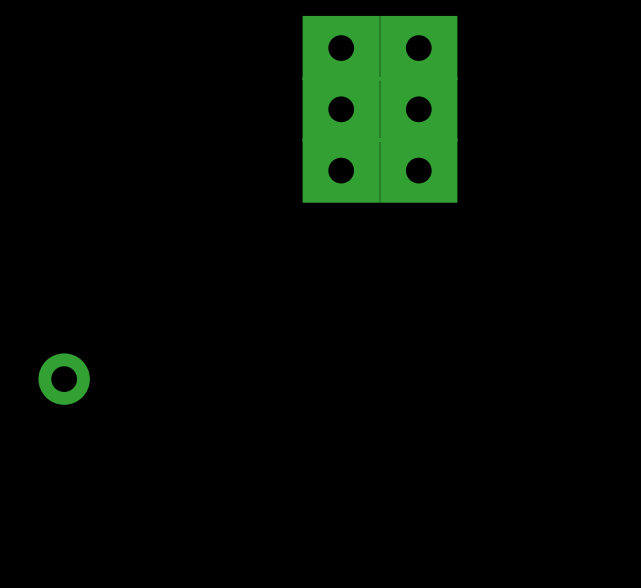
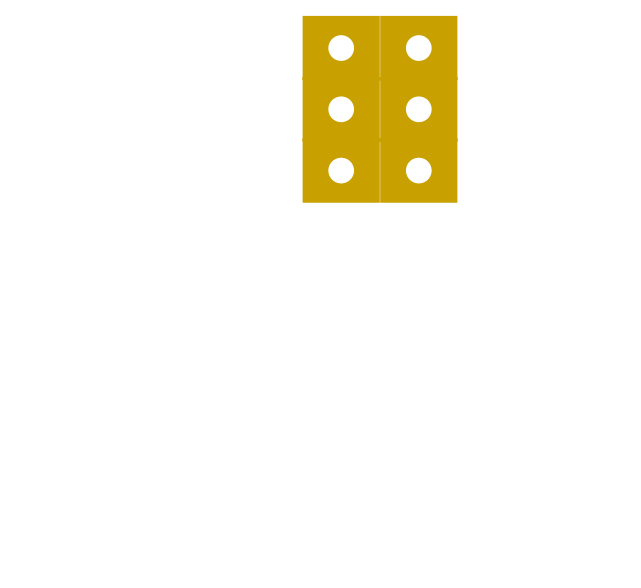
via: (64, 379) -> none

